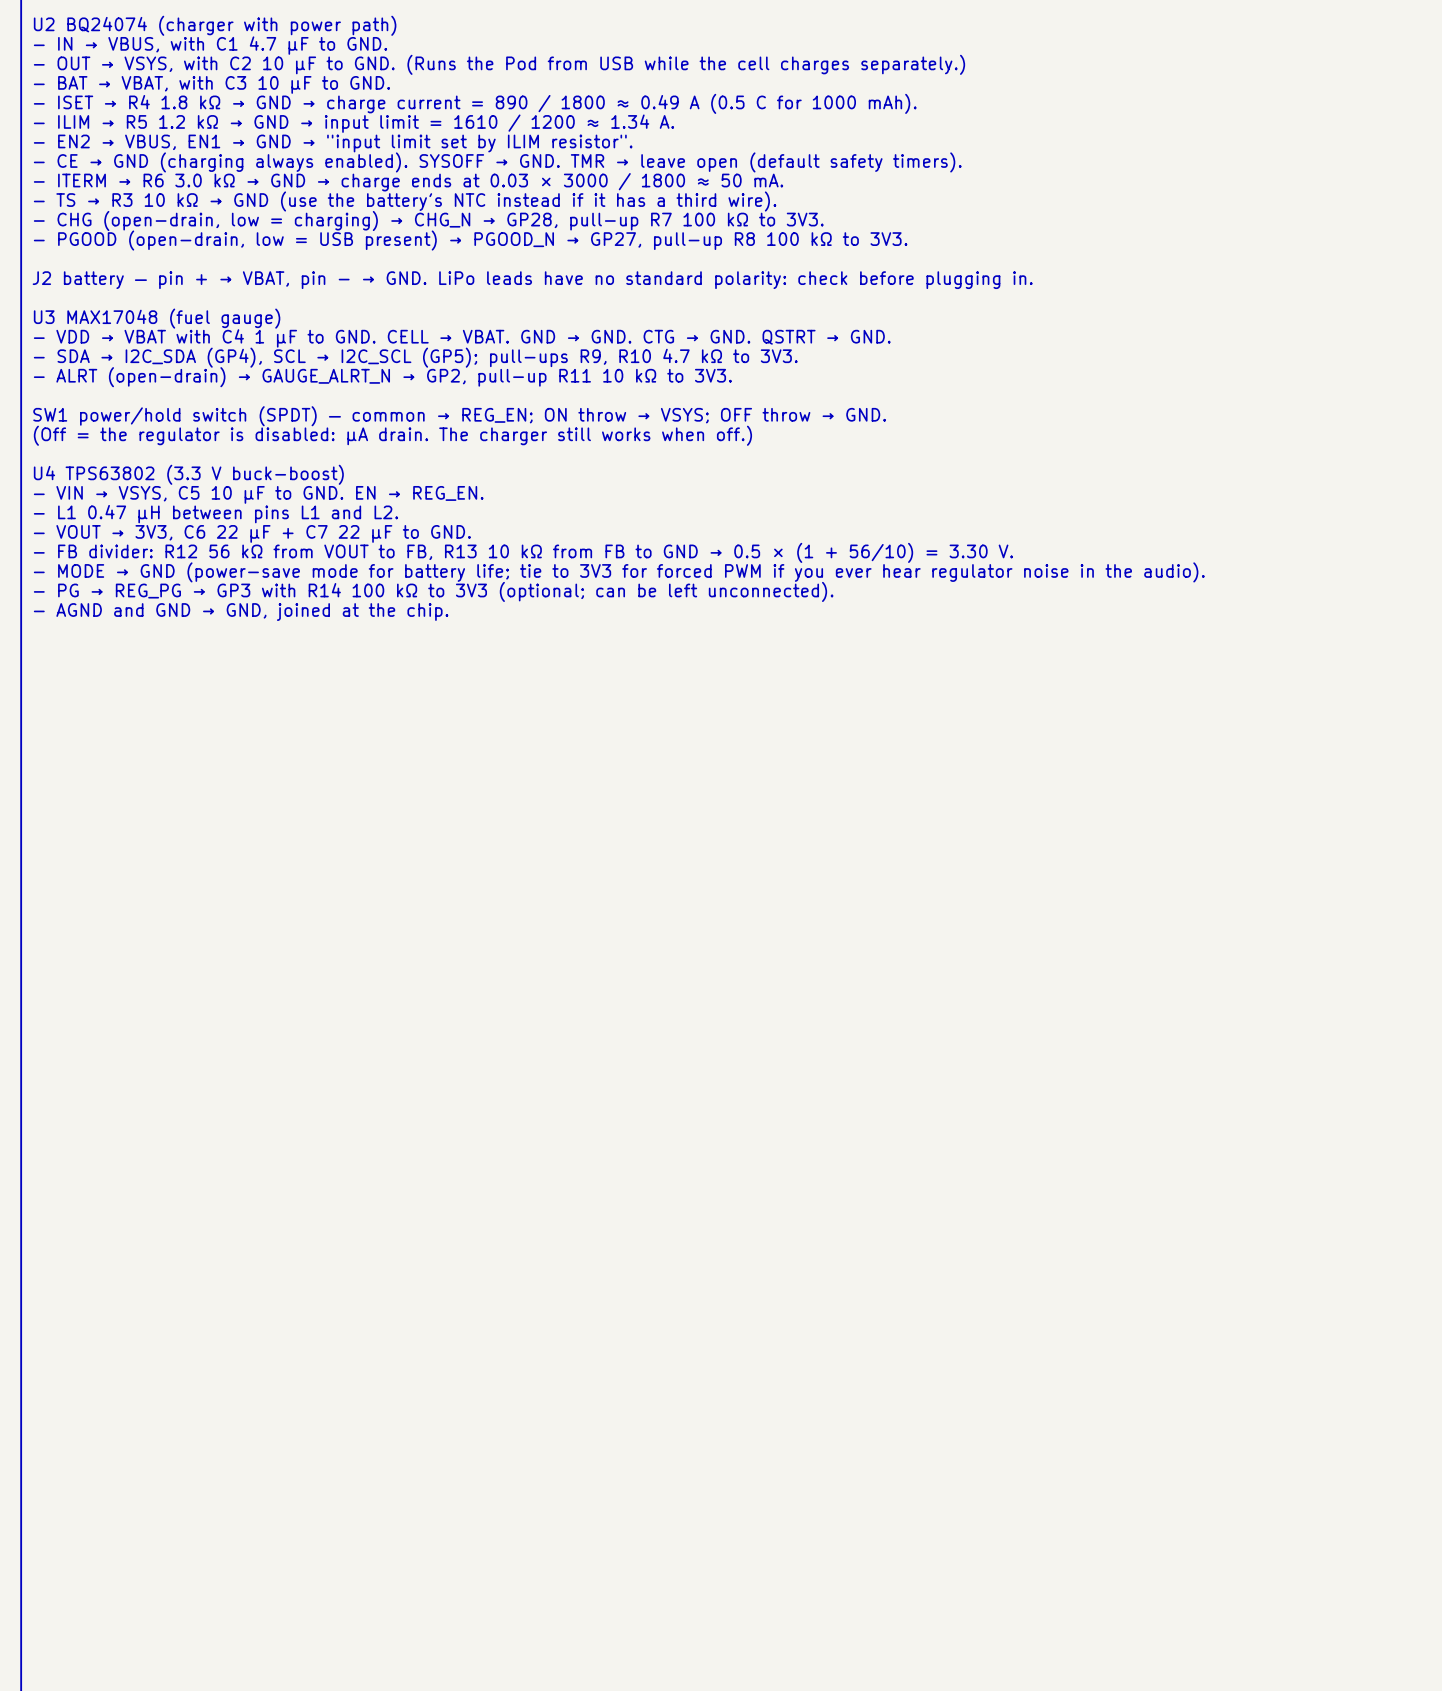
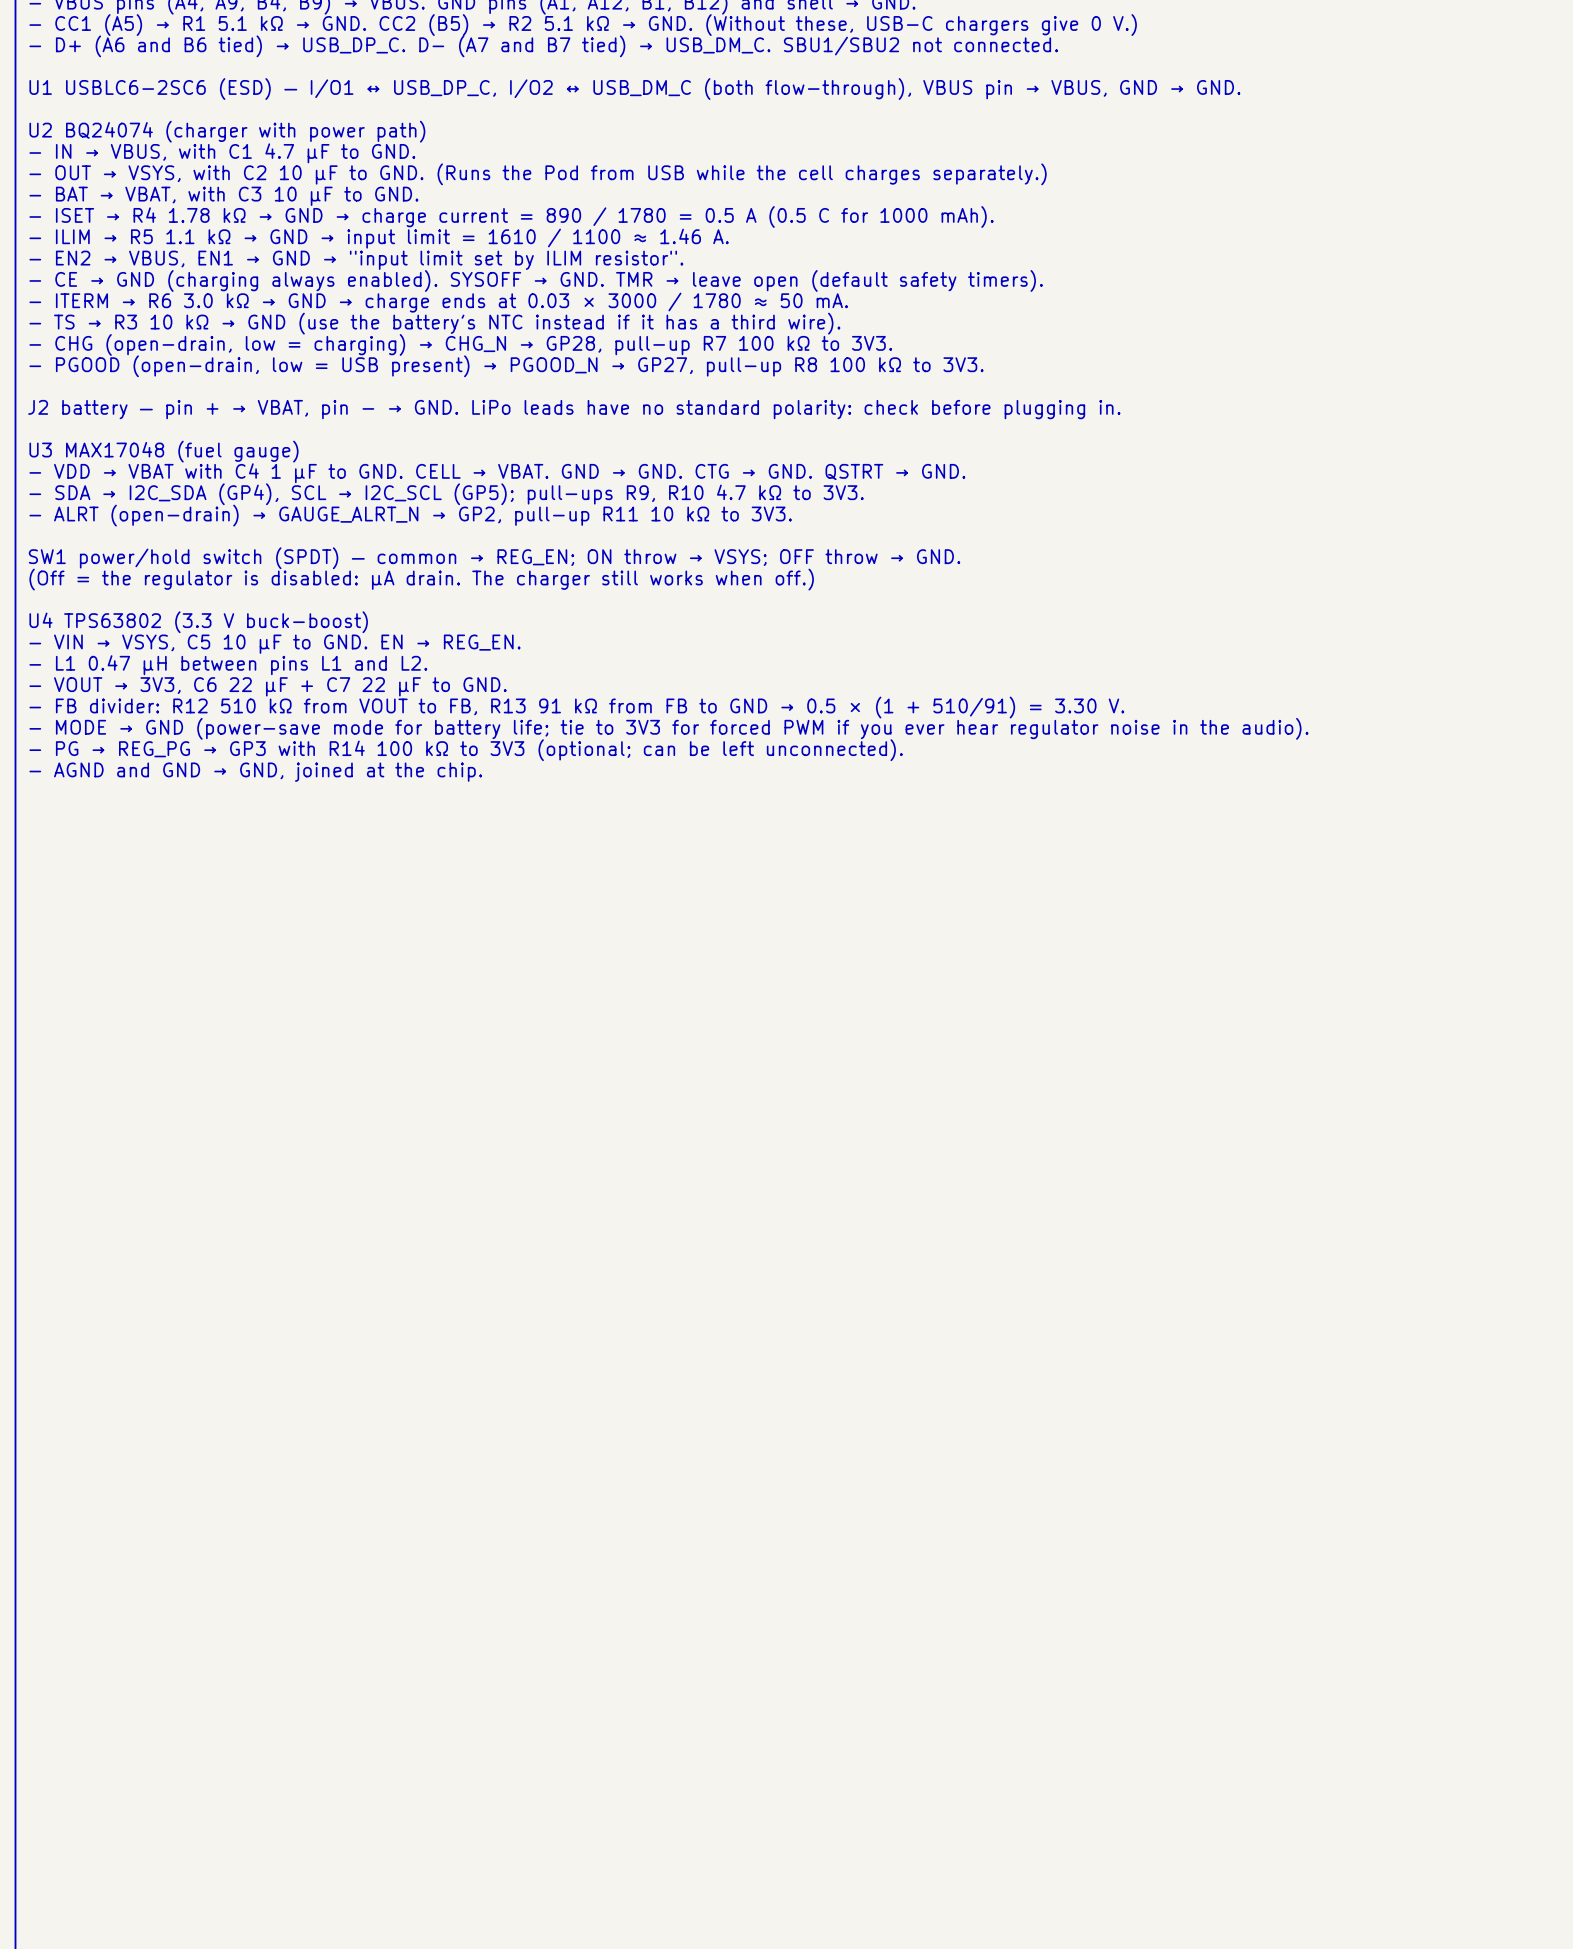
text: - ISET → R4 1.8 kΩ → GND → charge current = 890 / 1800 ≈ 0.49 A (0.5 C for 1000 mAh). (475, 103) -> - ISET → R4 1.78 kΩ → GND → charge current = 890 / 1780 = 0.5 A (0.5 C for 1000 mAh). (511, 216)
text: - ILIM → R5 1.2 kΩ → GND → input limit = 1610 / 1200 ≈ 1.34 A. (353, 123) -> - ILIM → R5 1.1 kΩ → GND → input limit = 1610 / 1100 ≈ 1.46 A. (379, 238)
text: - ITERM → R6 3.0 kΩ → GND → charge ends at 0.03 × 3000 / 1800 ≈ 50 mA. (408, 182) -> - ITERM → R6 3.0 kΩ → GND → charge ends at 0.03 × 3000 / 1780 ≈ 50 mA. (438, 302)
text: - FB divider: R12 56 kΩ from VOUT to FB, R13 10 kΩ from FB to GND → 0.5 × (1 + 56/10) = 3.30 V. (523, 552) -> - FB divider: R12 510 kΩ from VOUT to FB, R13 91 kΩ from FB to GND → 0.5 × (1 + 510/91) = 3.30 V. (576, 707)

